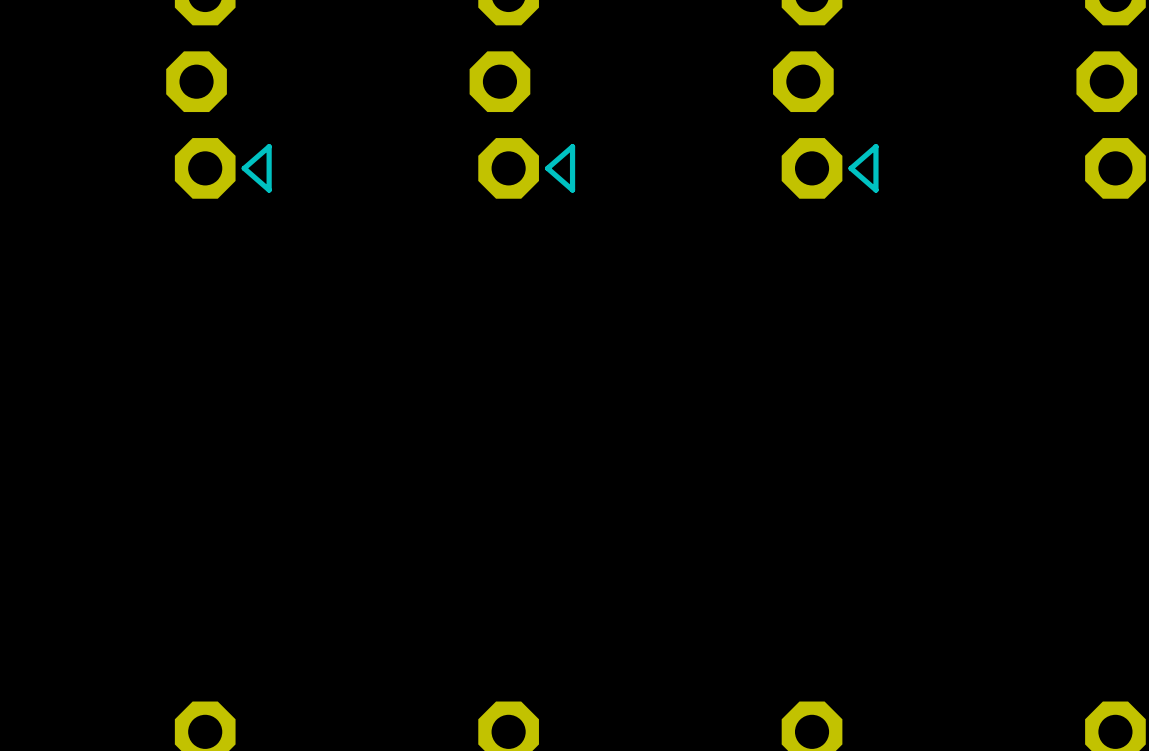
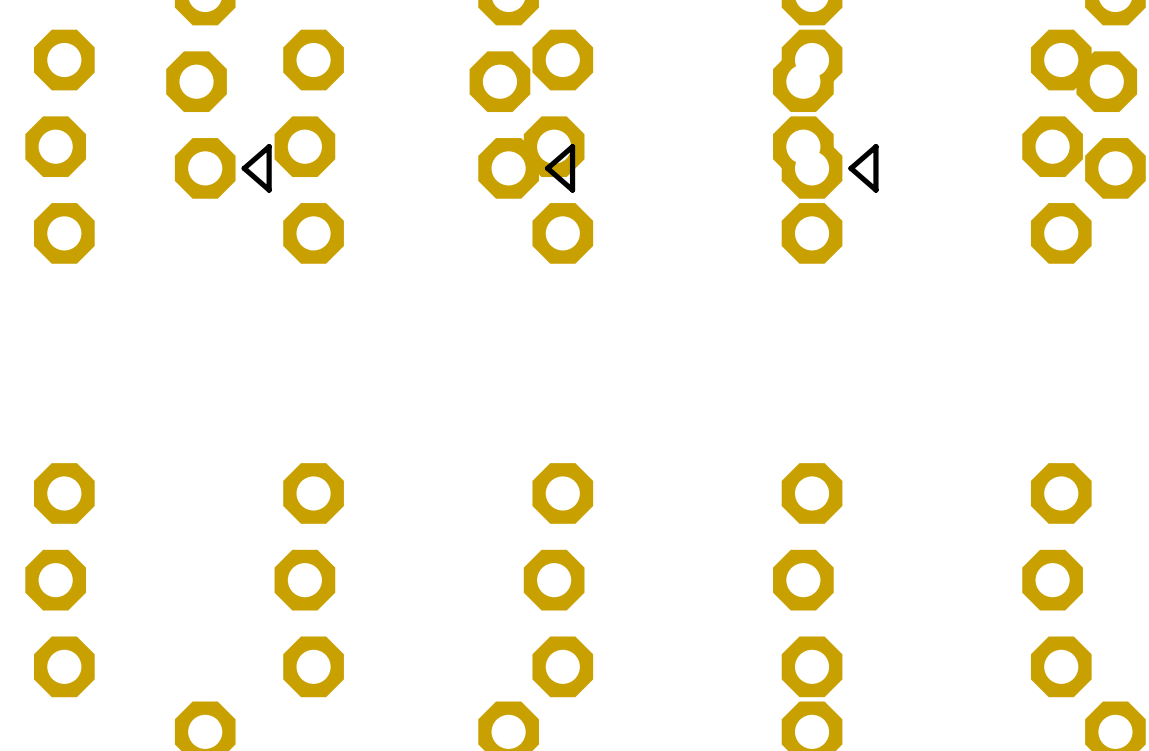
part: none -> (60, 146)
part: none -> (309, 146)
part: none -> (558, 146)
part: none -> (807, 146)
part: none -> (1056, 146)
part: none -> (60, 580)
part: none -> (309, 580)
part: none -> (558, 580)
part: none -> (807, 580)
part: none -> (1056, 580)

